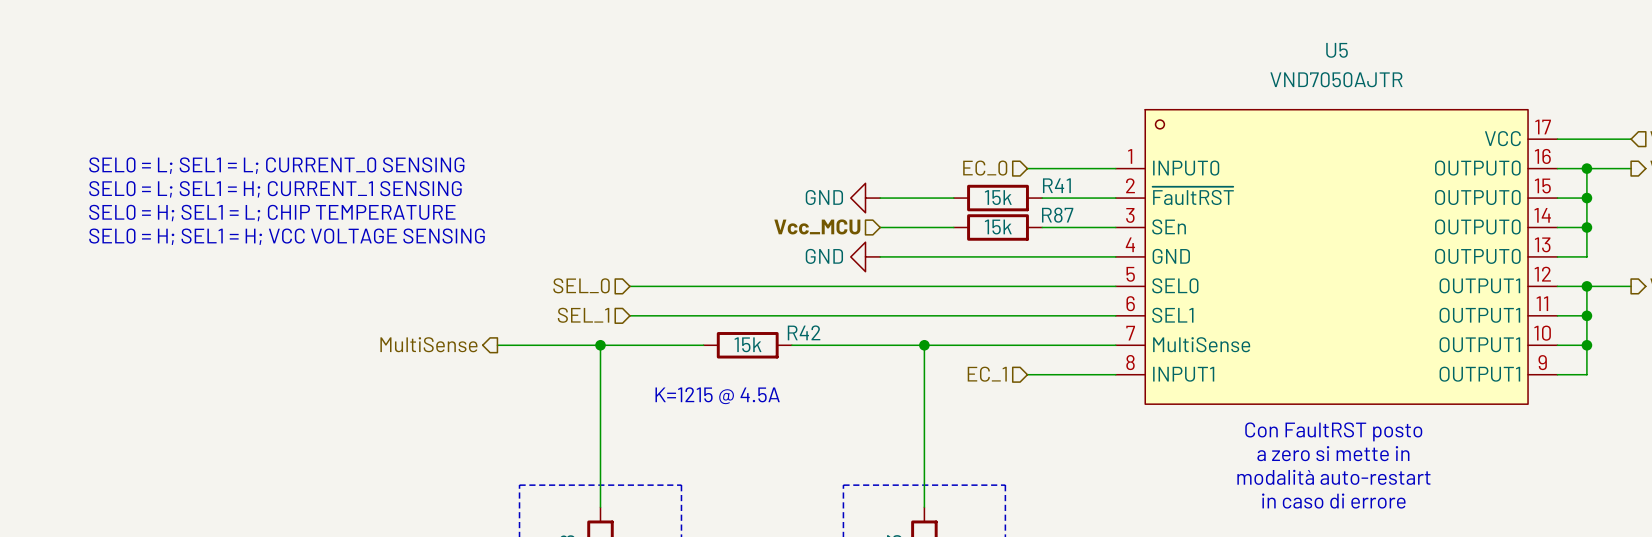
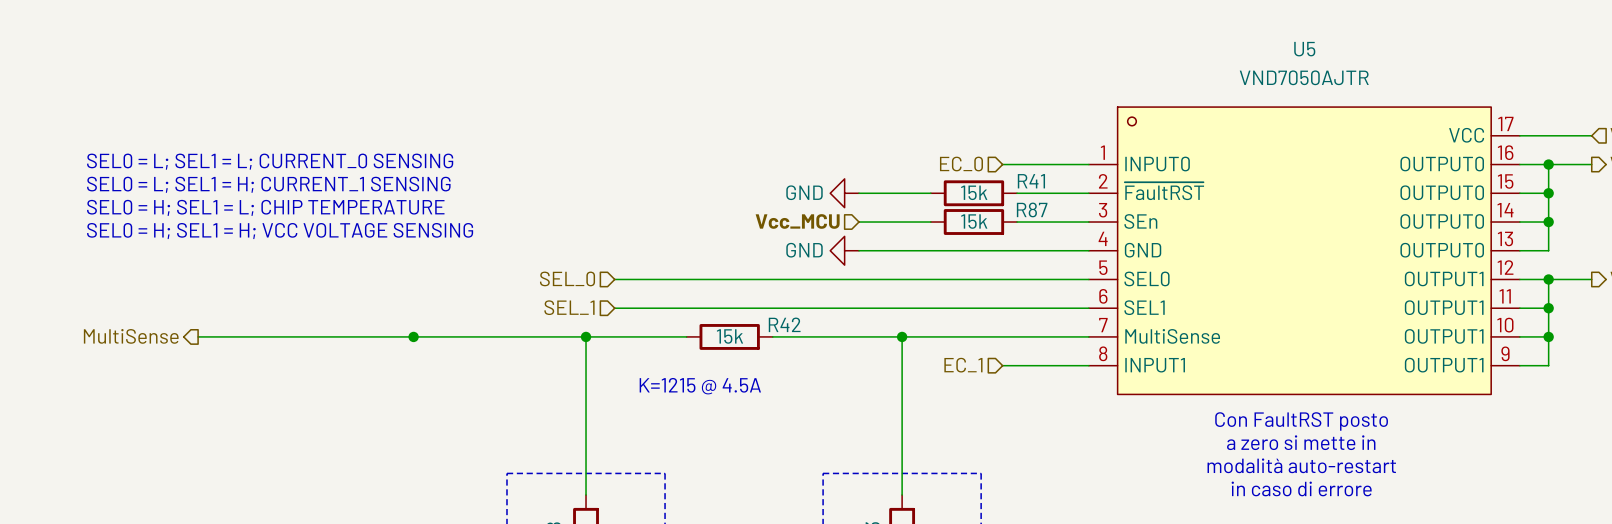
hierarchical label: none -> MultiSense (131, 336)
hierarchical label: MultiSense (428, 344) -> none
wire: none -> (198, 336) (485, 336)
junction: none -> (413, 336)

